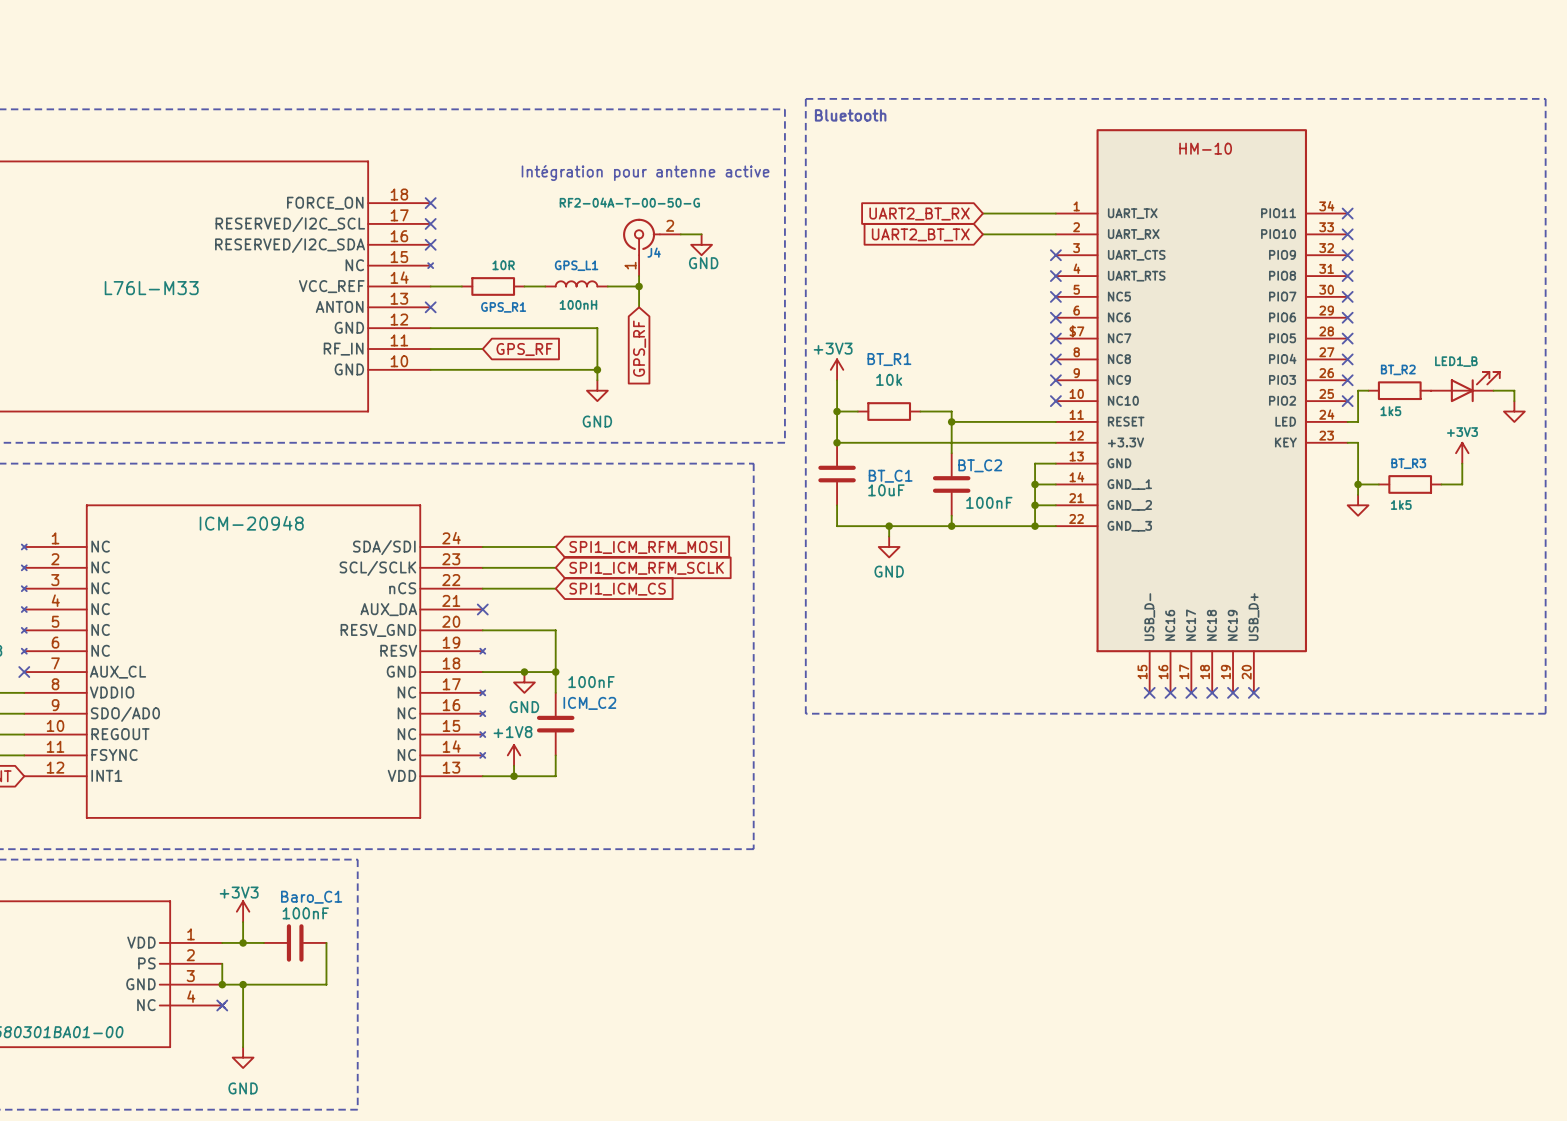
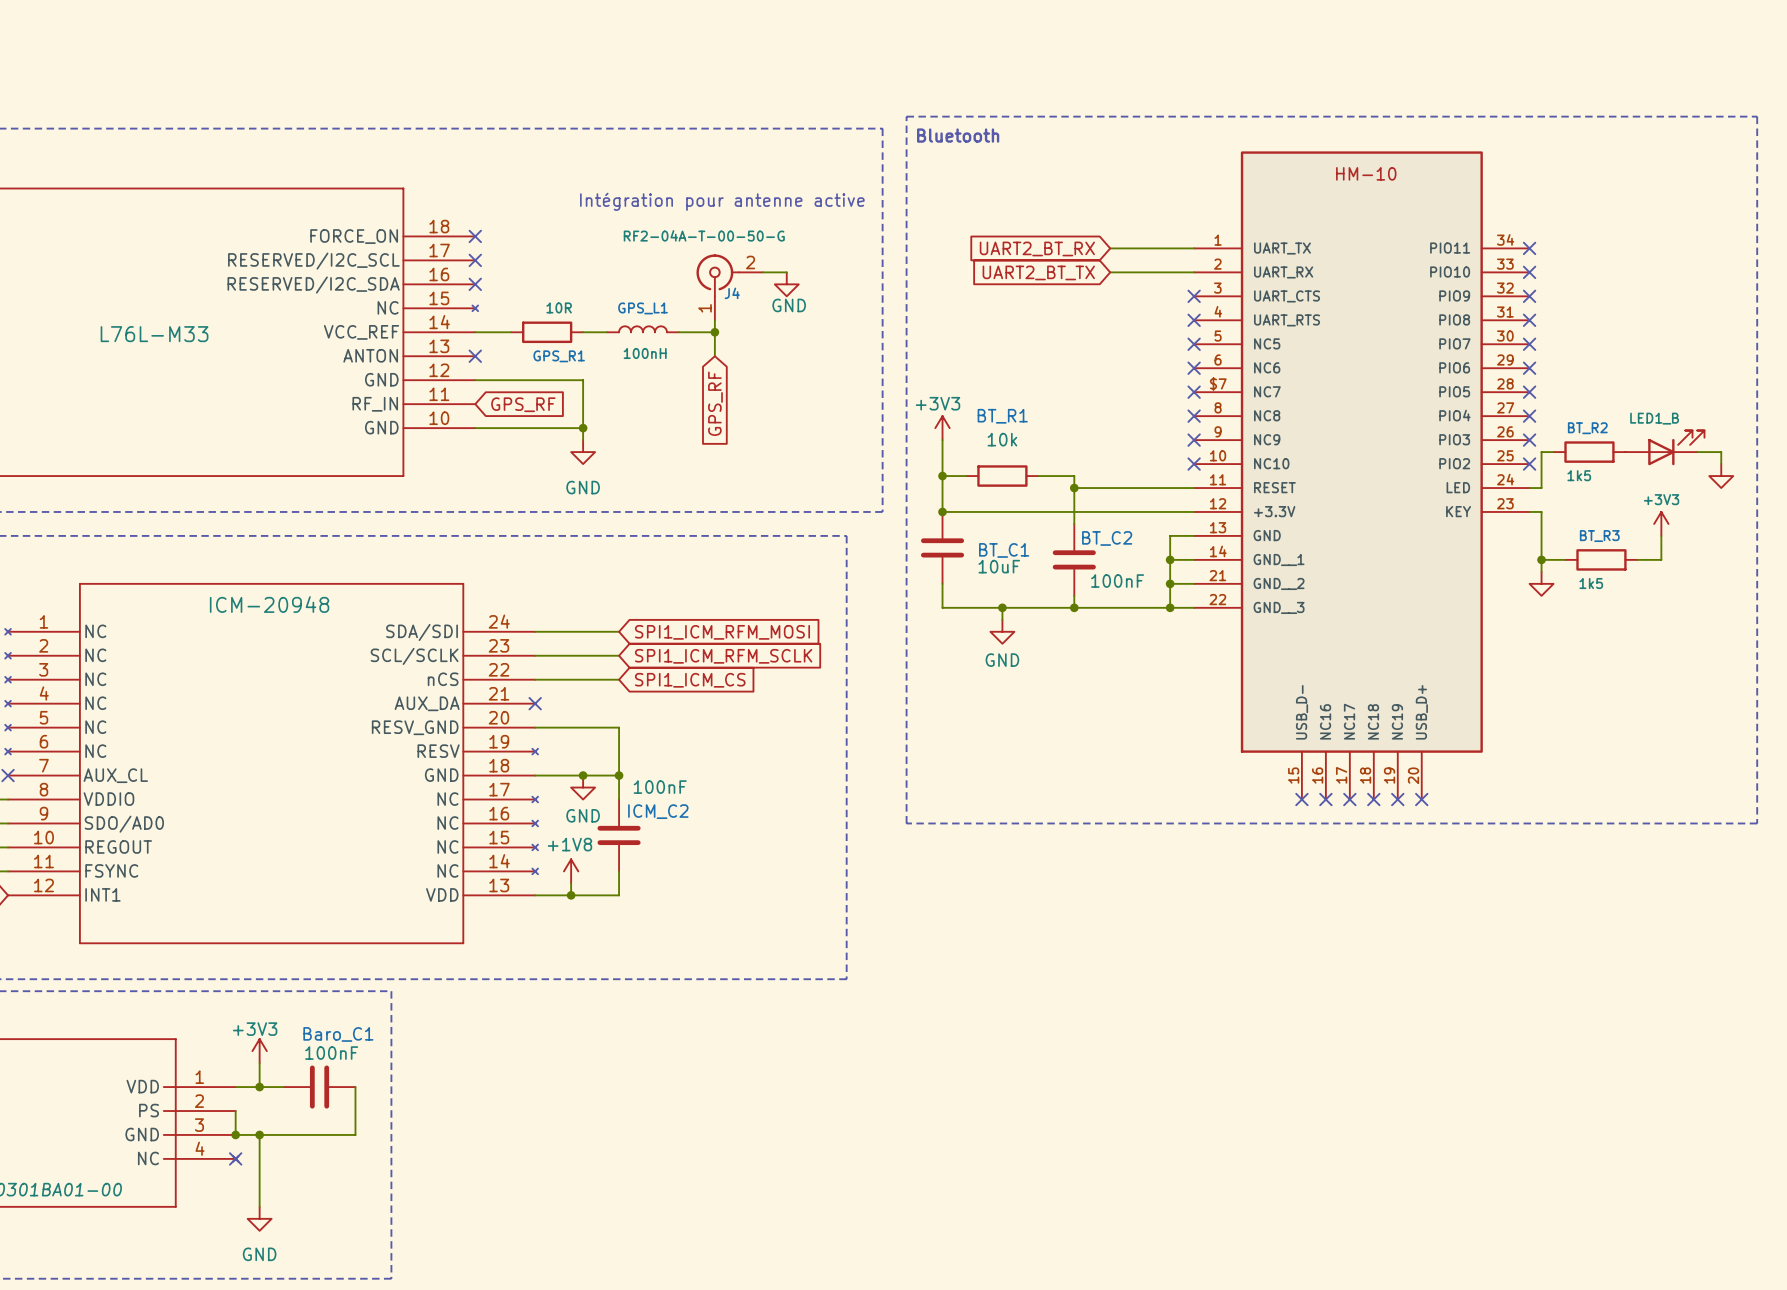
wire: (524, 328) (597, 328) (597, 380) -> (583, 380) (583, 440)
wire: (430, 349) (482, 349) -> none
global label position: GPS_RF (524, 349) -> GPS_RF (523, 404)
wire: (524, 369) (597, 369) -> none
junction: none -> (583, 428)
junction: (597, 369) -> none
power symbol position: GND (597, 390) -> GND (583, 452)

